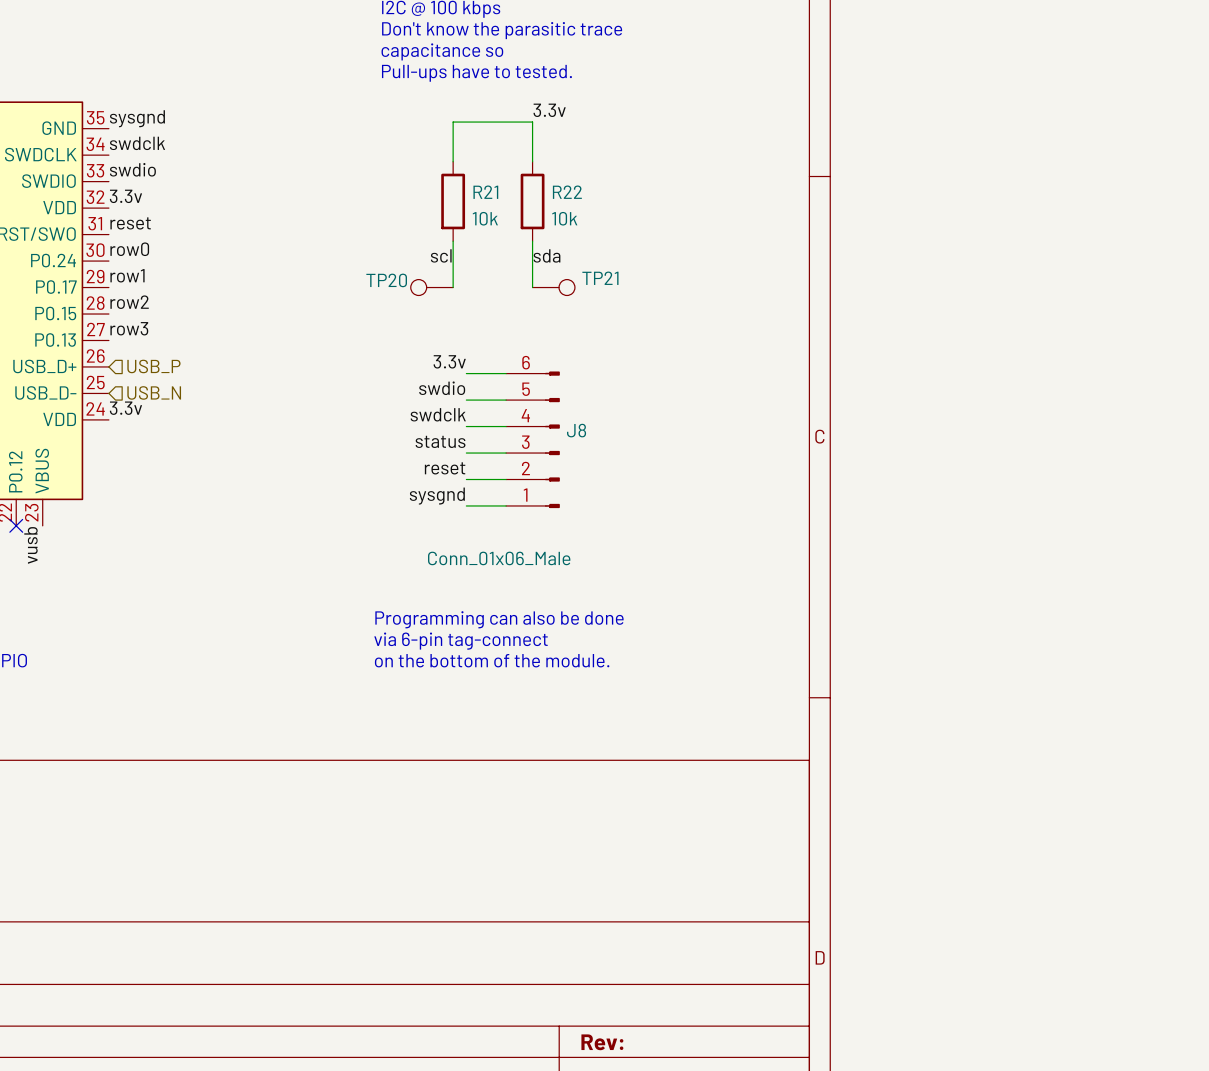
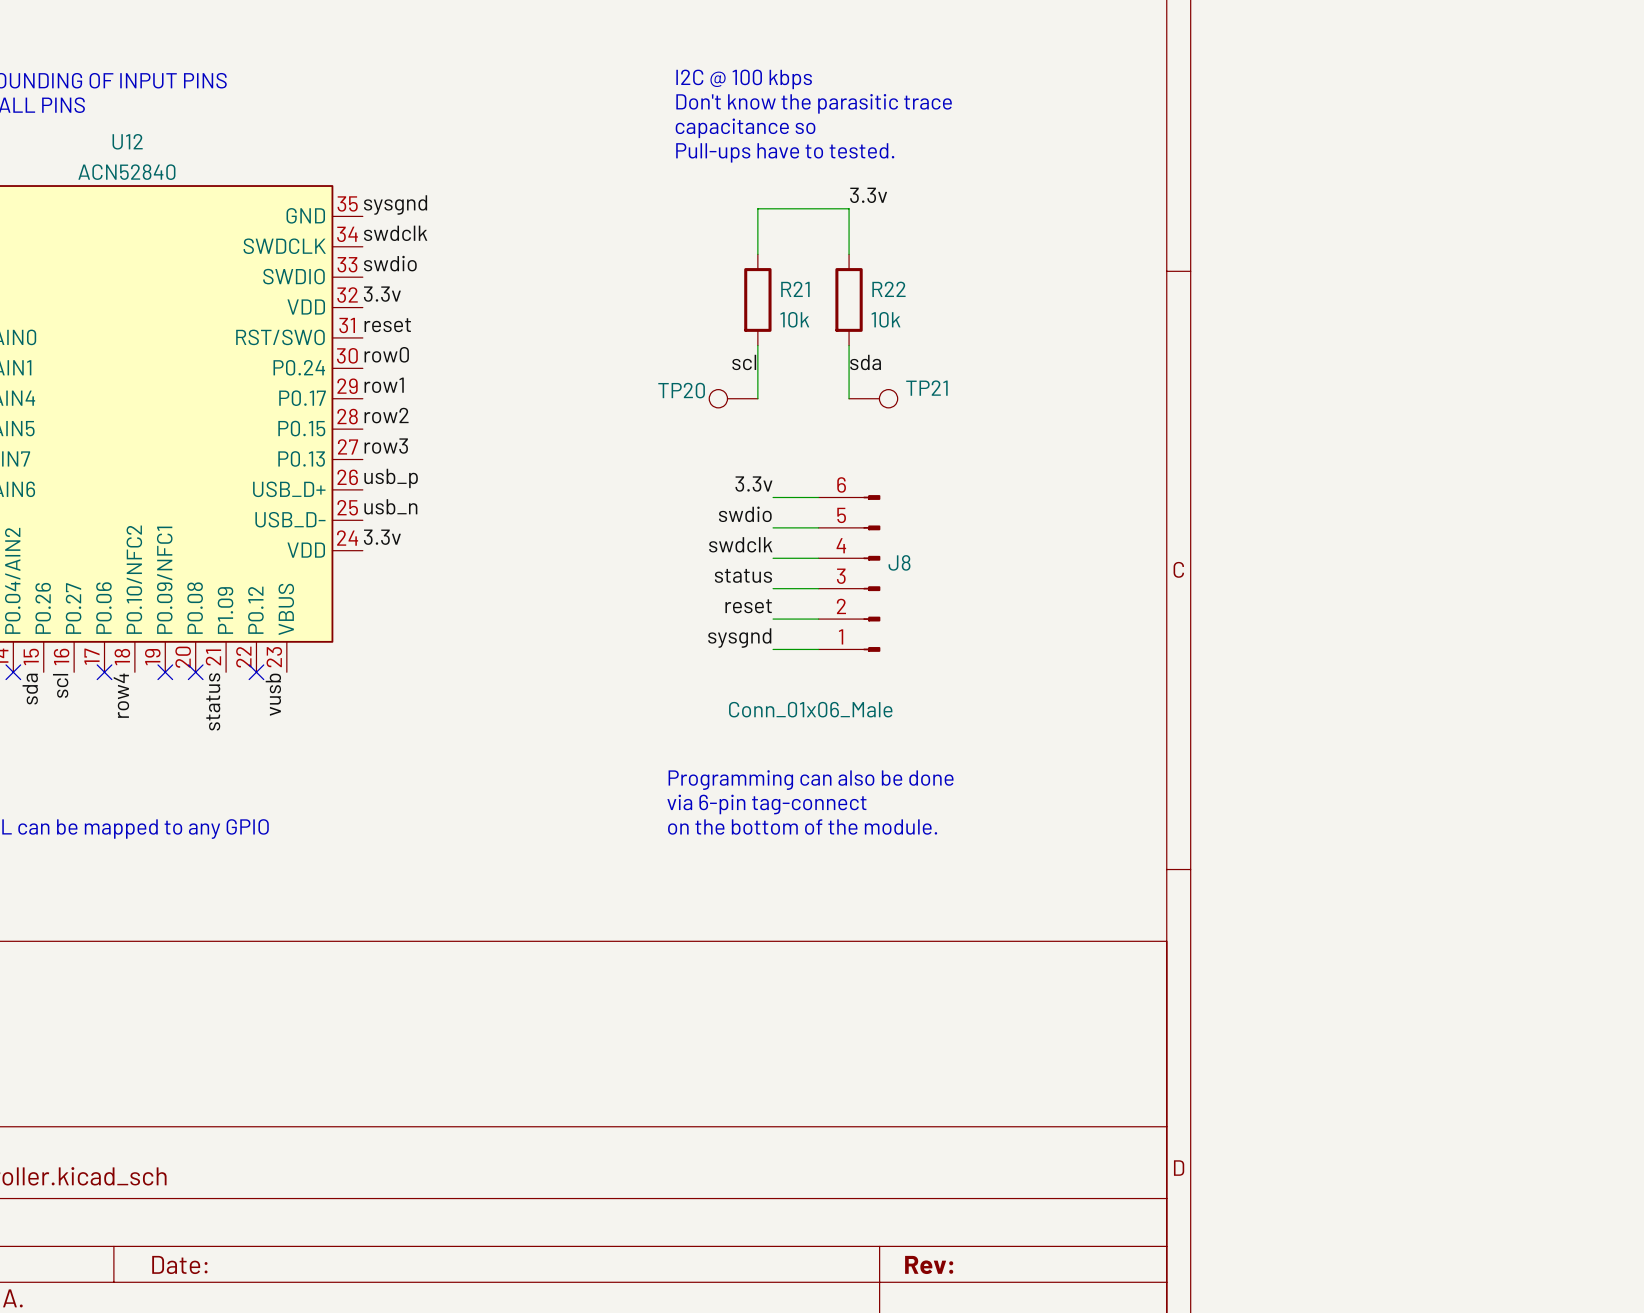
label: none -> usb_p (391, 478)
hierarchical label: USB_P (153, 366) -> none
label: none -> usb_n (390, 506)
hierarchical label: USB_N (154, 392) -> none

